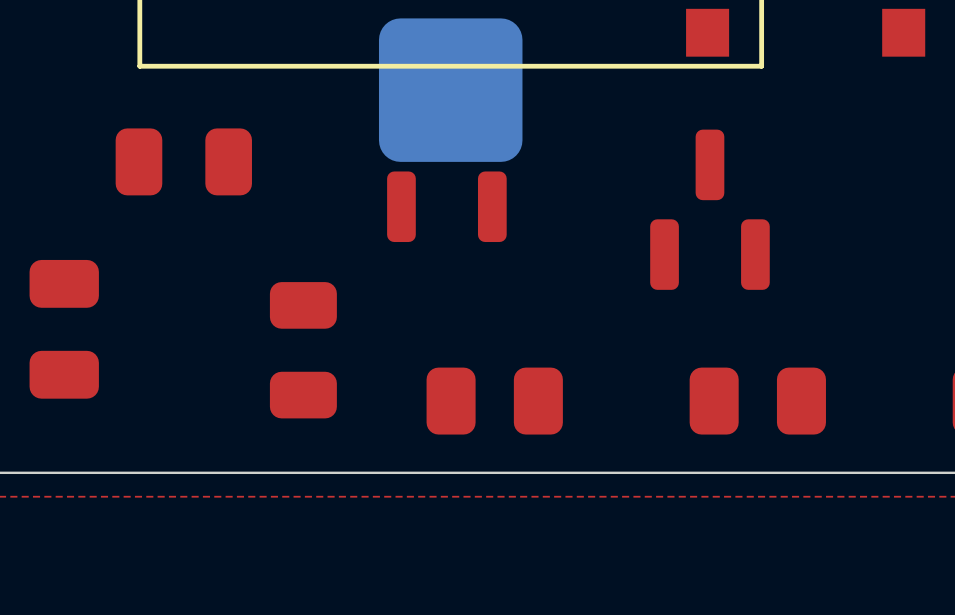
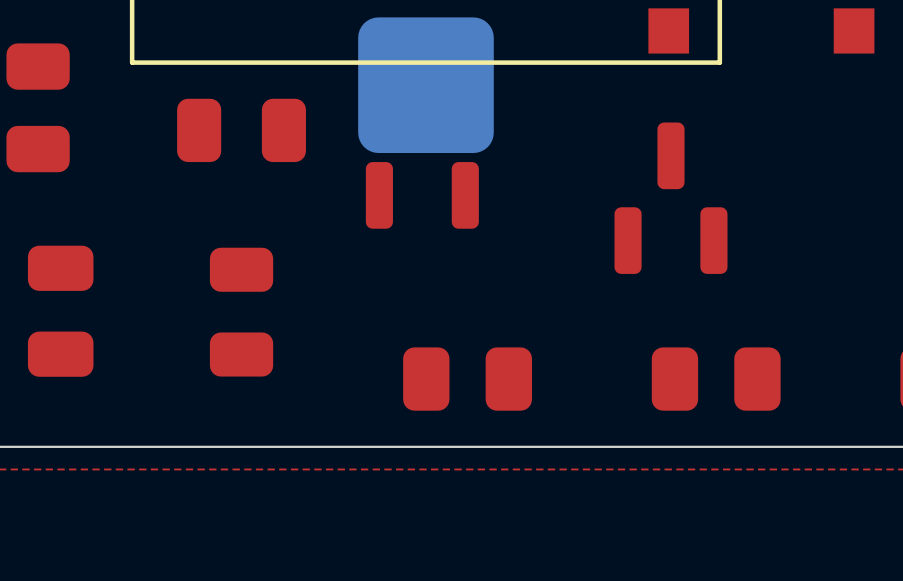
part: none -> (38, 107)
part position: (183, 161) -> (241, 130)
part position: (303, 350) -> (241, 312)

